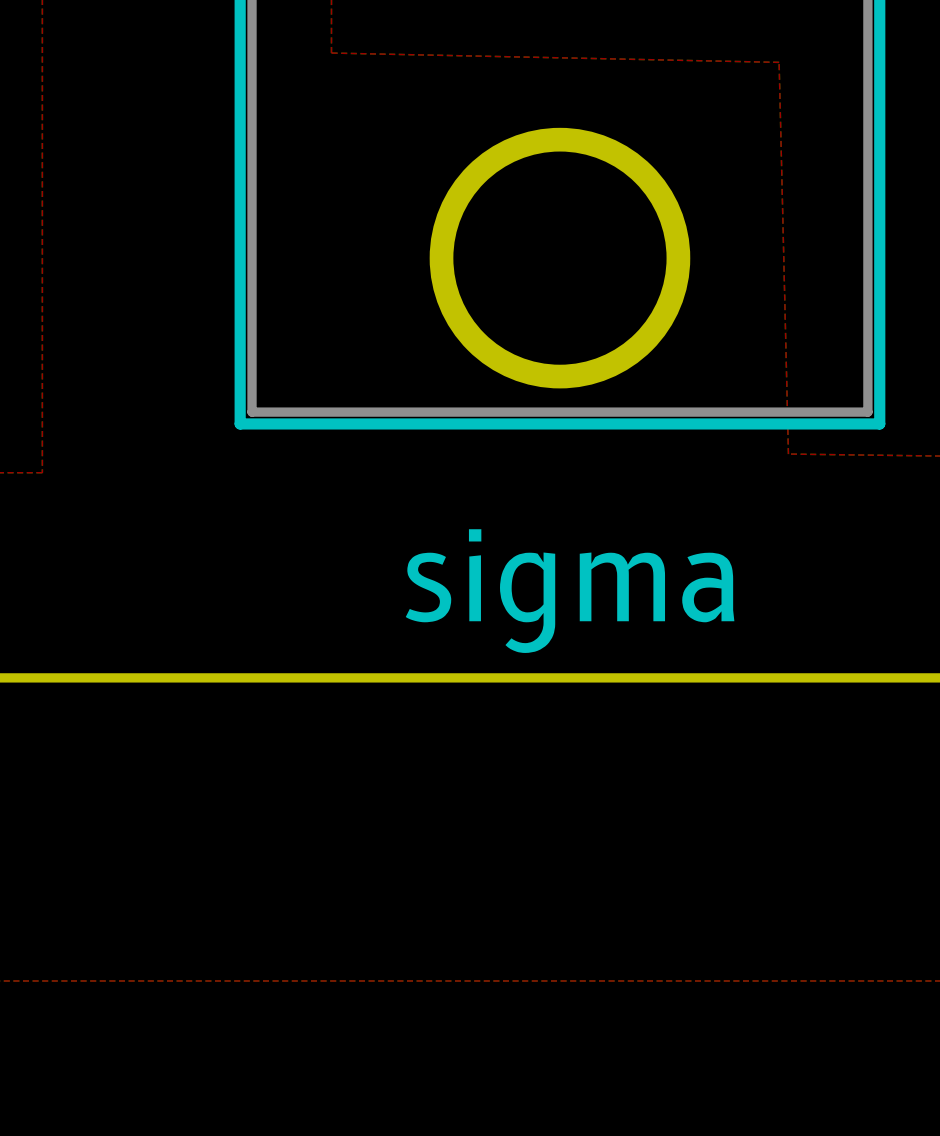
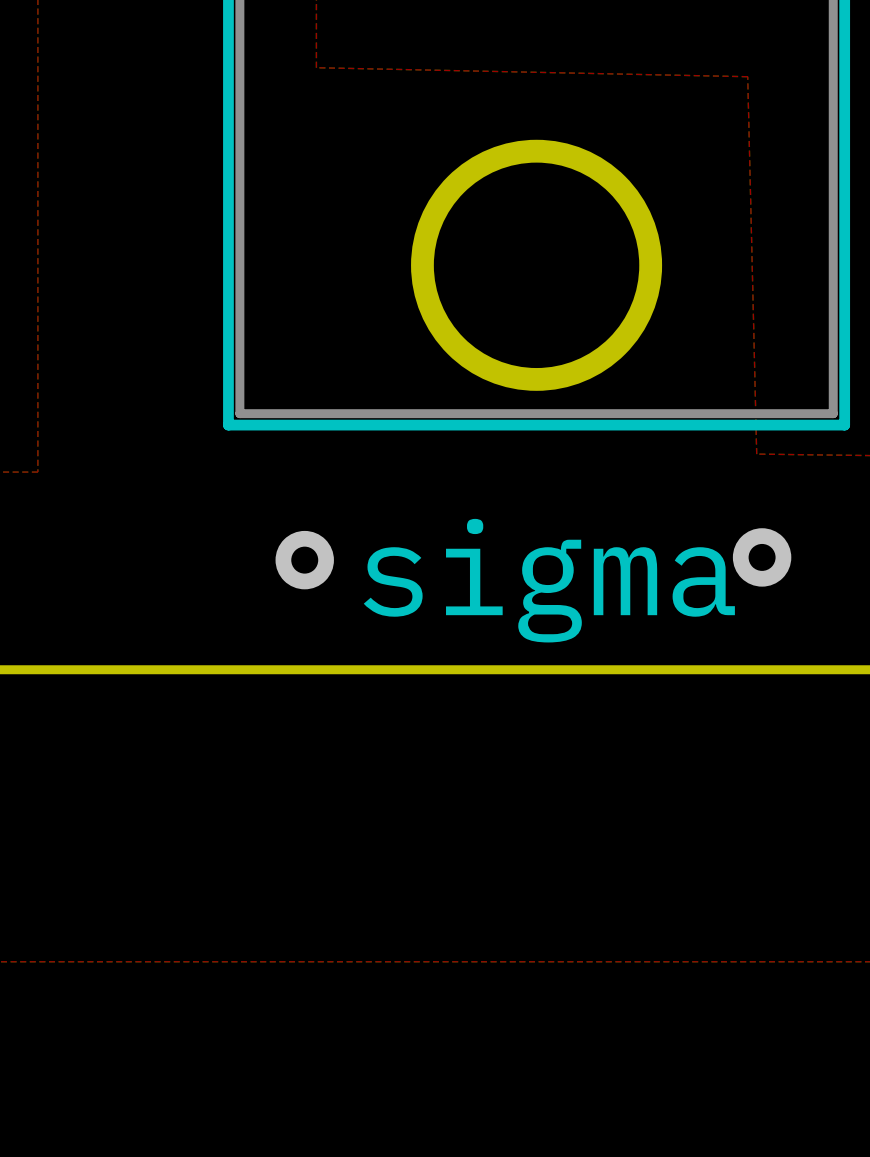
via: none -> (762, 557)
via: none -> (304, 560)

